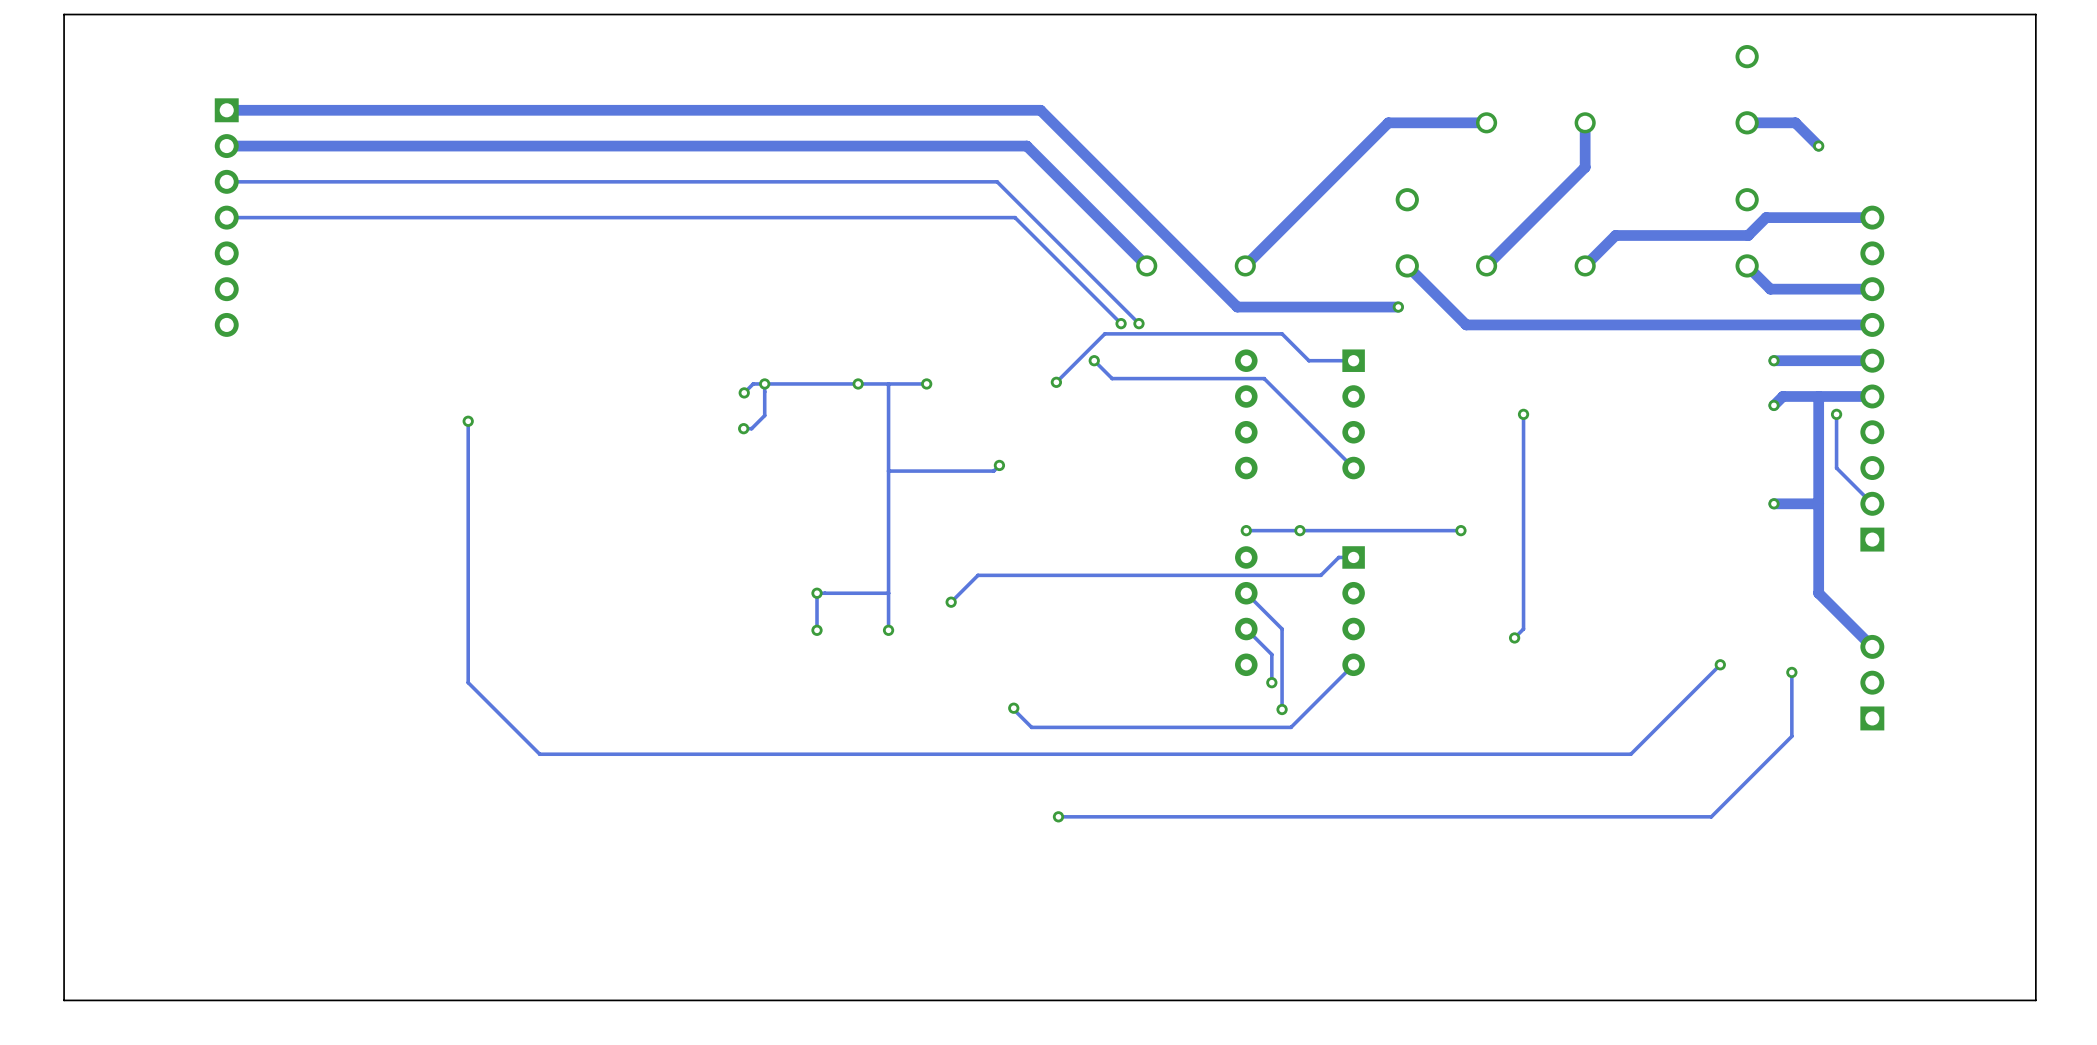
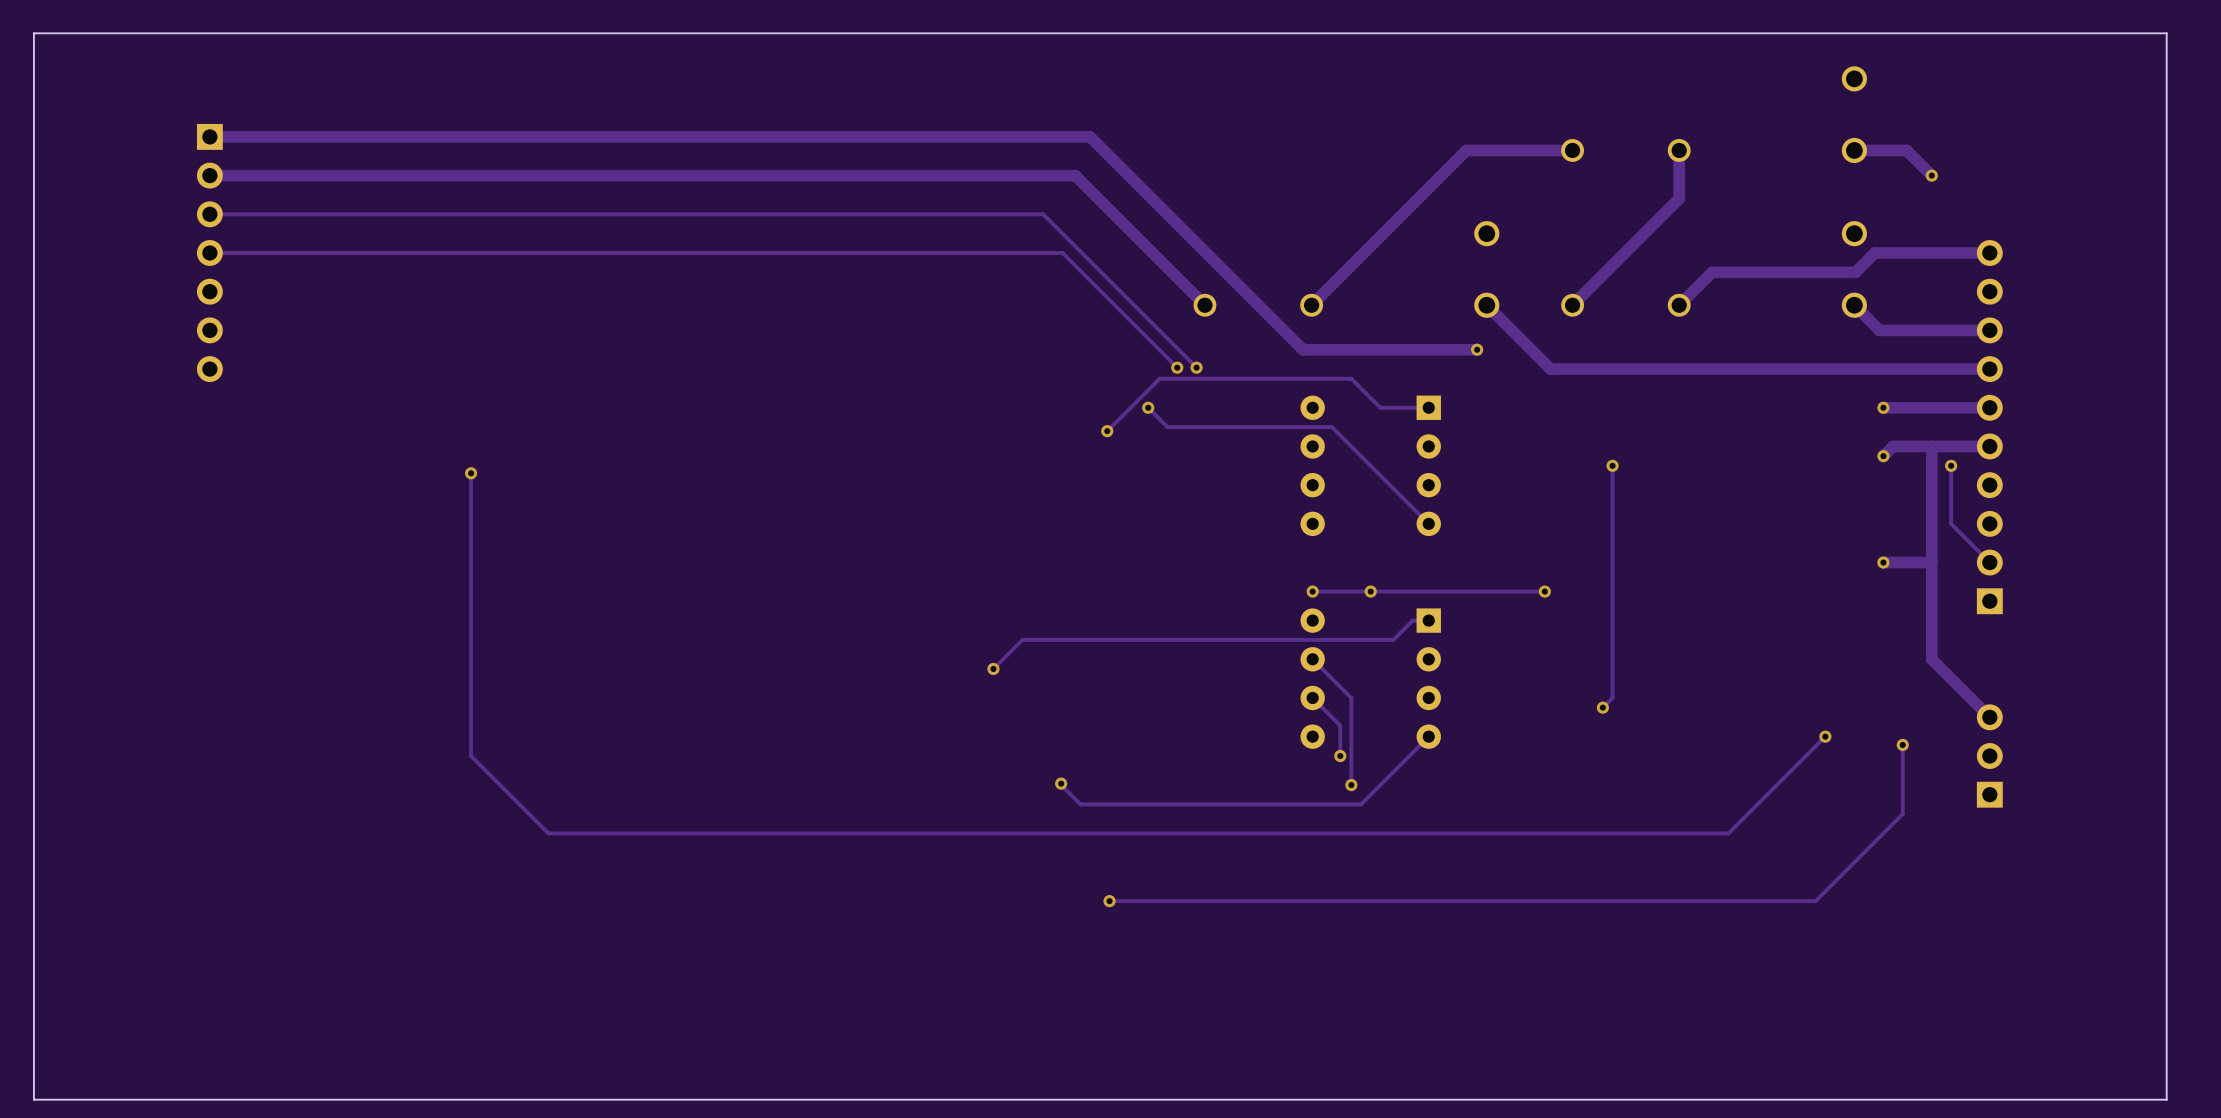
track: (764, 383) (764, 415) (751, 428) (743, 428) -> none
via: (764, 383) -> none
via: (858, 383) -> none
track: (888, 383) (888, 630) -> none
track: (926, 383) (753, 383) (744, 392) -> none
via: (926, 383) -> none
via: (744, 392) -> none
via: (743, 428) -> none
track: (999, 465) (993, 471) (888, 471) -> none
via: (999, 465) -> none
via: (817, 593) -> none
track: (888, 593) (817, 593) (817, 630) -> none
via: (817, 630) -> none
via: (888, 630) -> none

